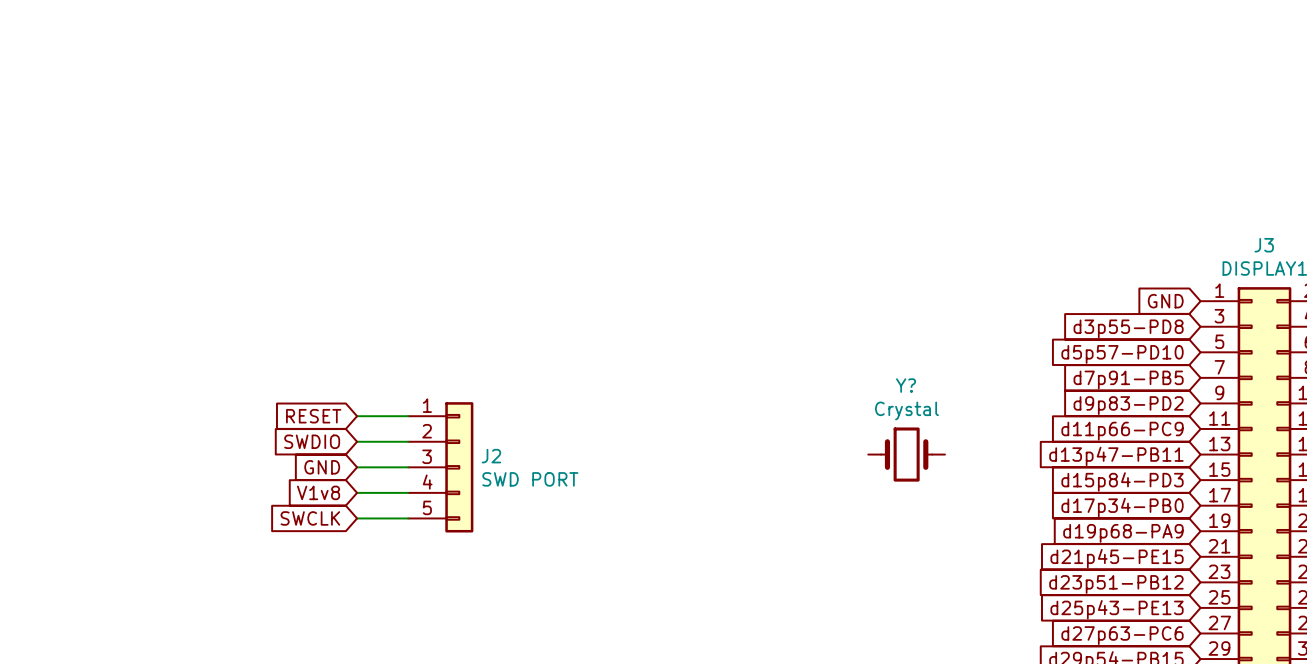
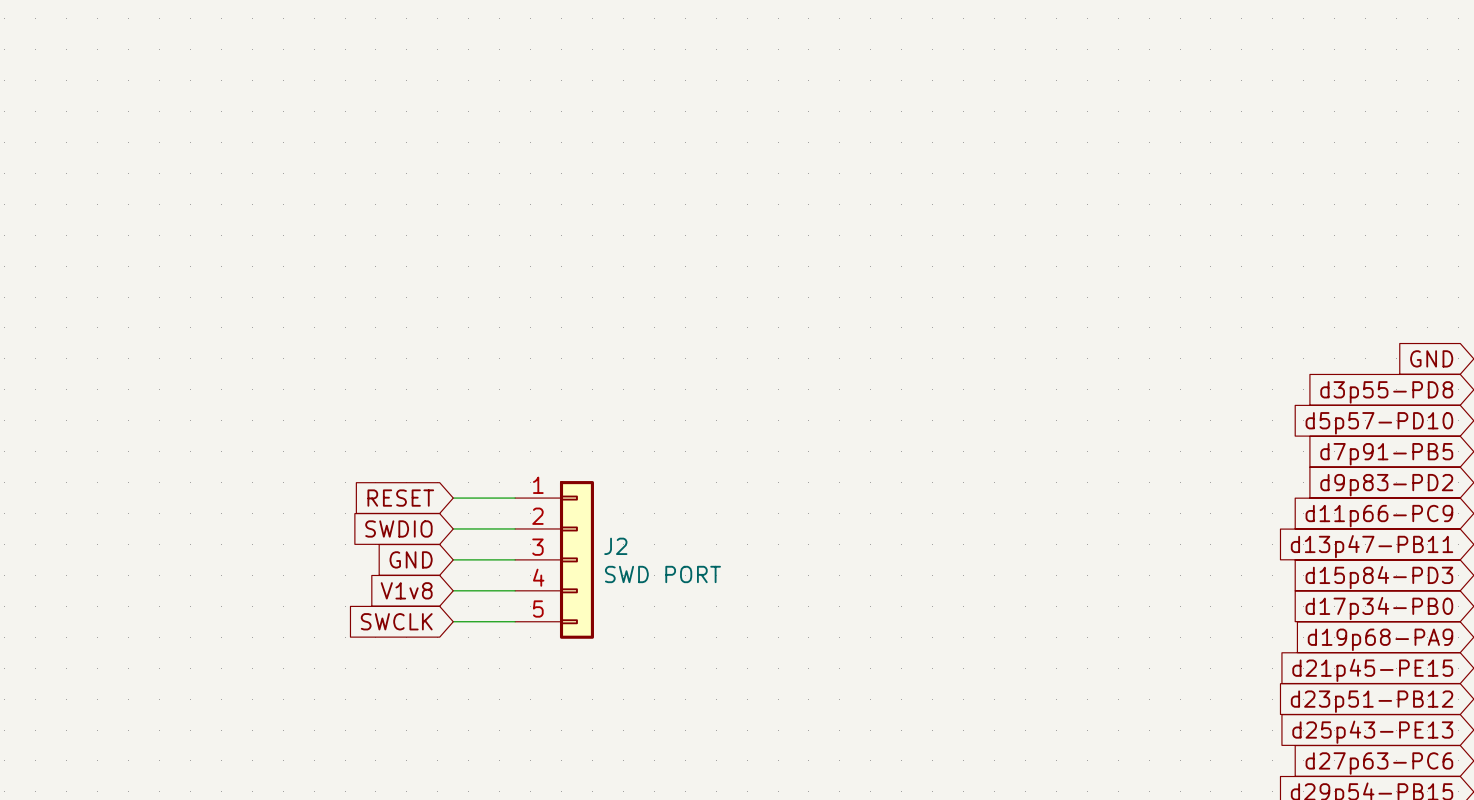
Y?: Crystal (906, 454) -> none

